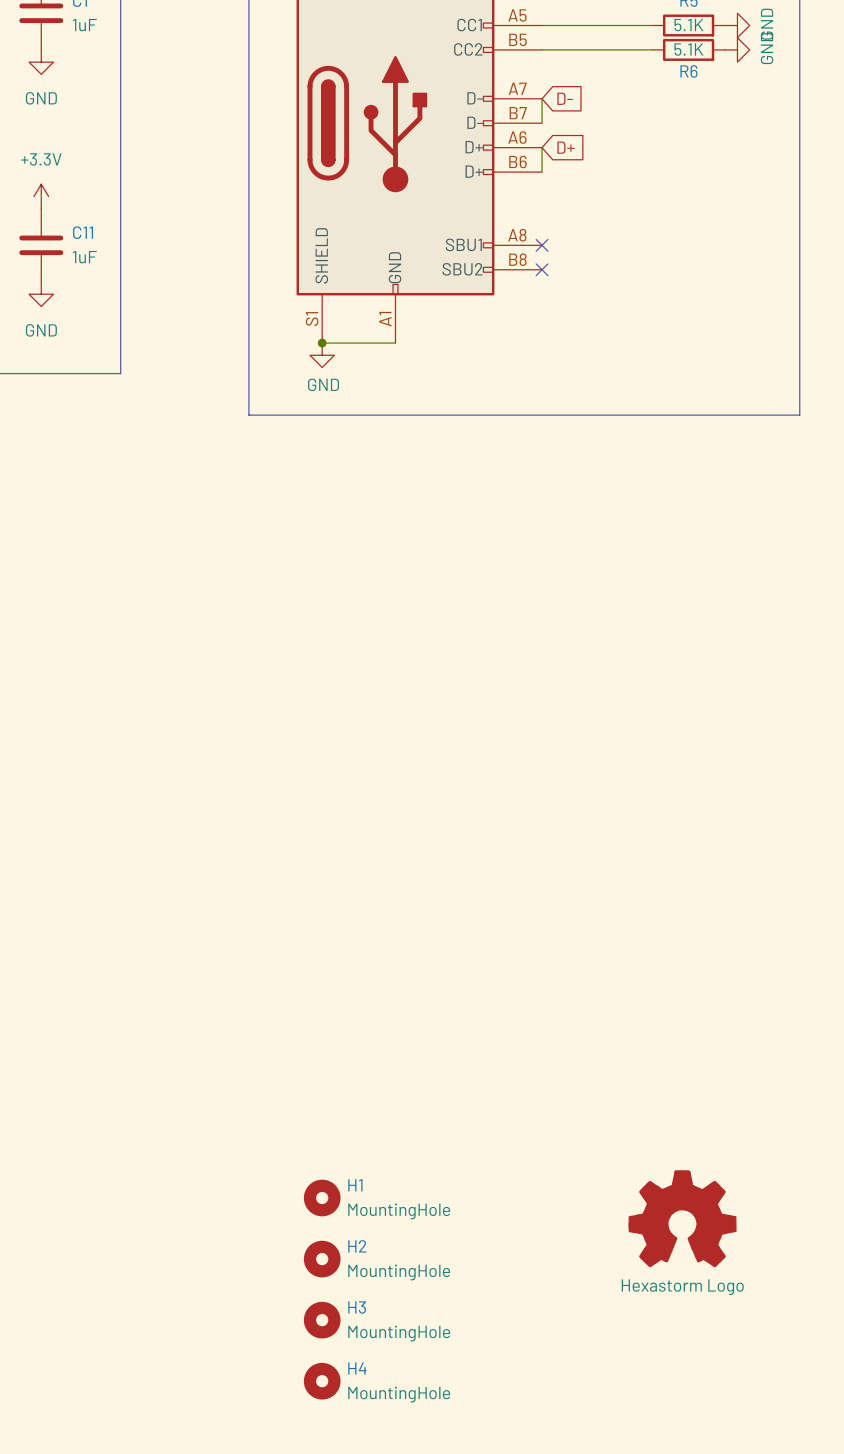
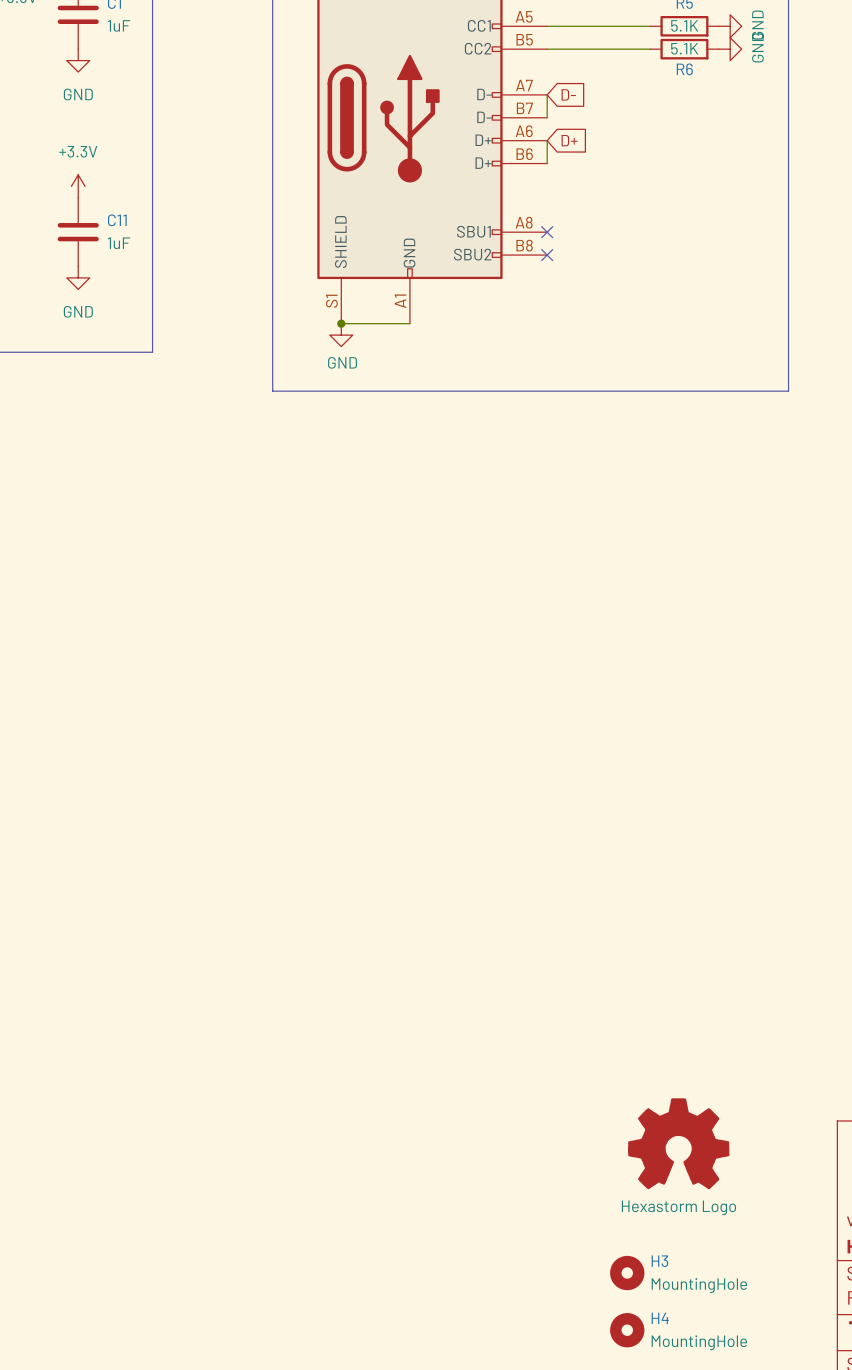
H1: MountingHole (322, 1198) -> none
H2: MountingHole (322, 1259) -> none
H3 position: (322, 1320) -> (627, 1273)
H4 position: (322, 1381) -> (627, 1330)

